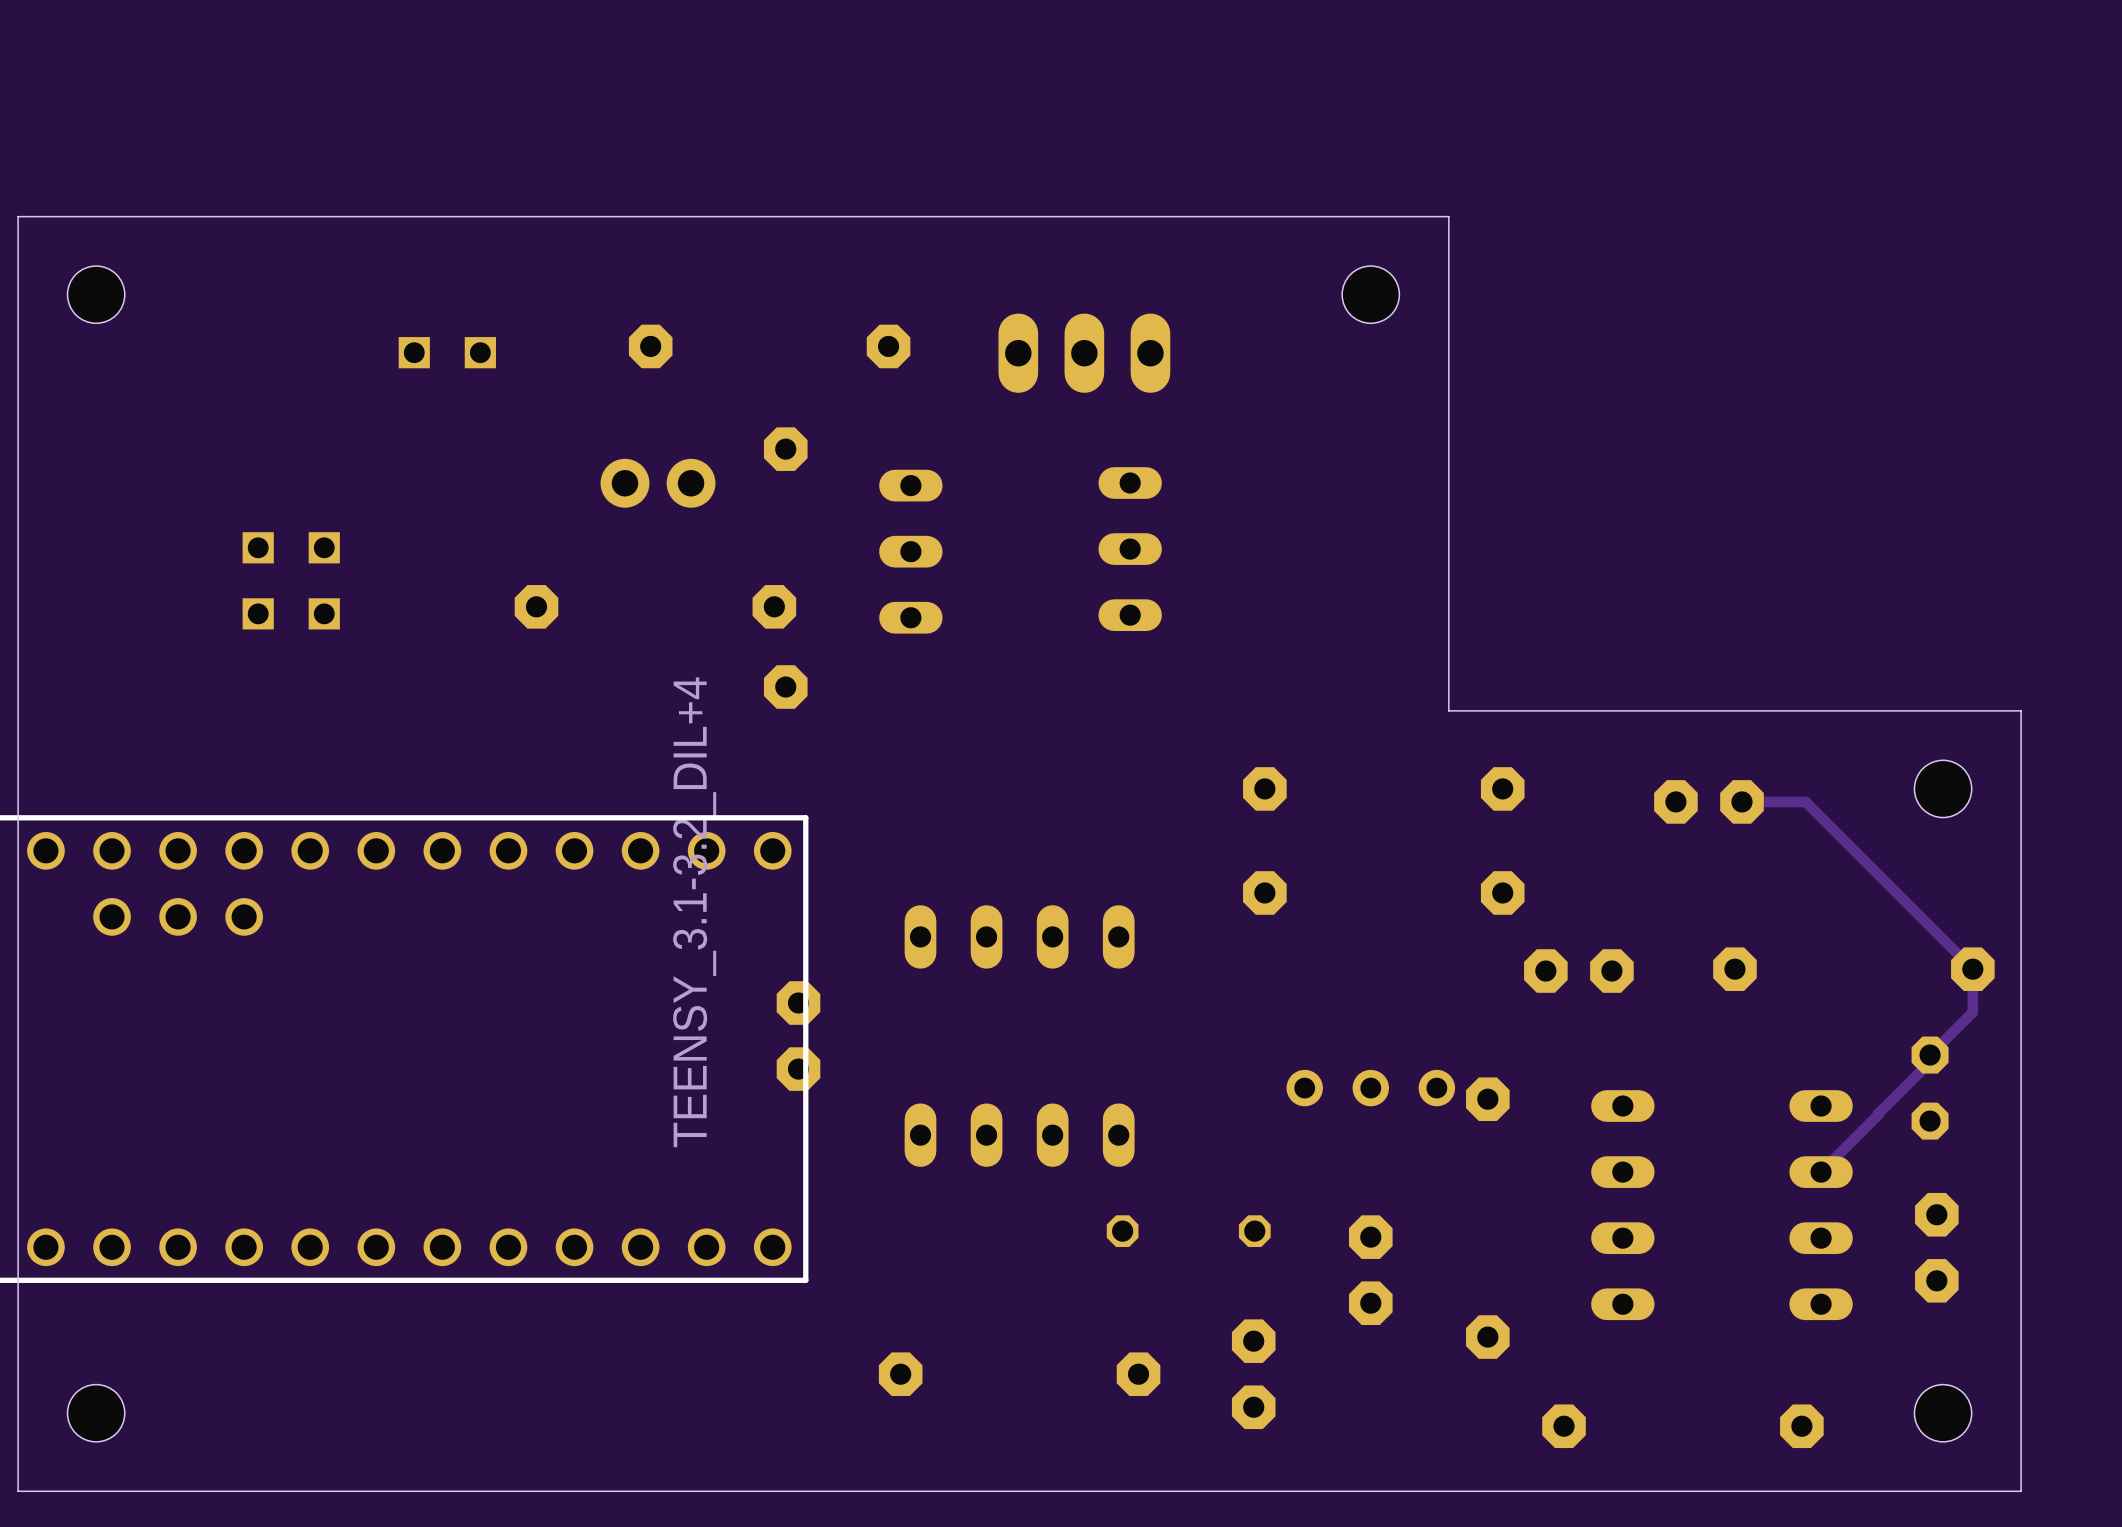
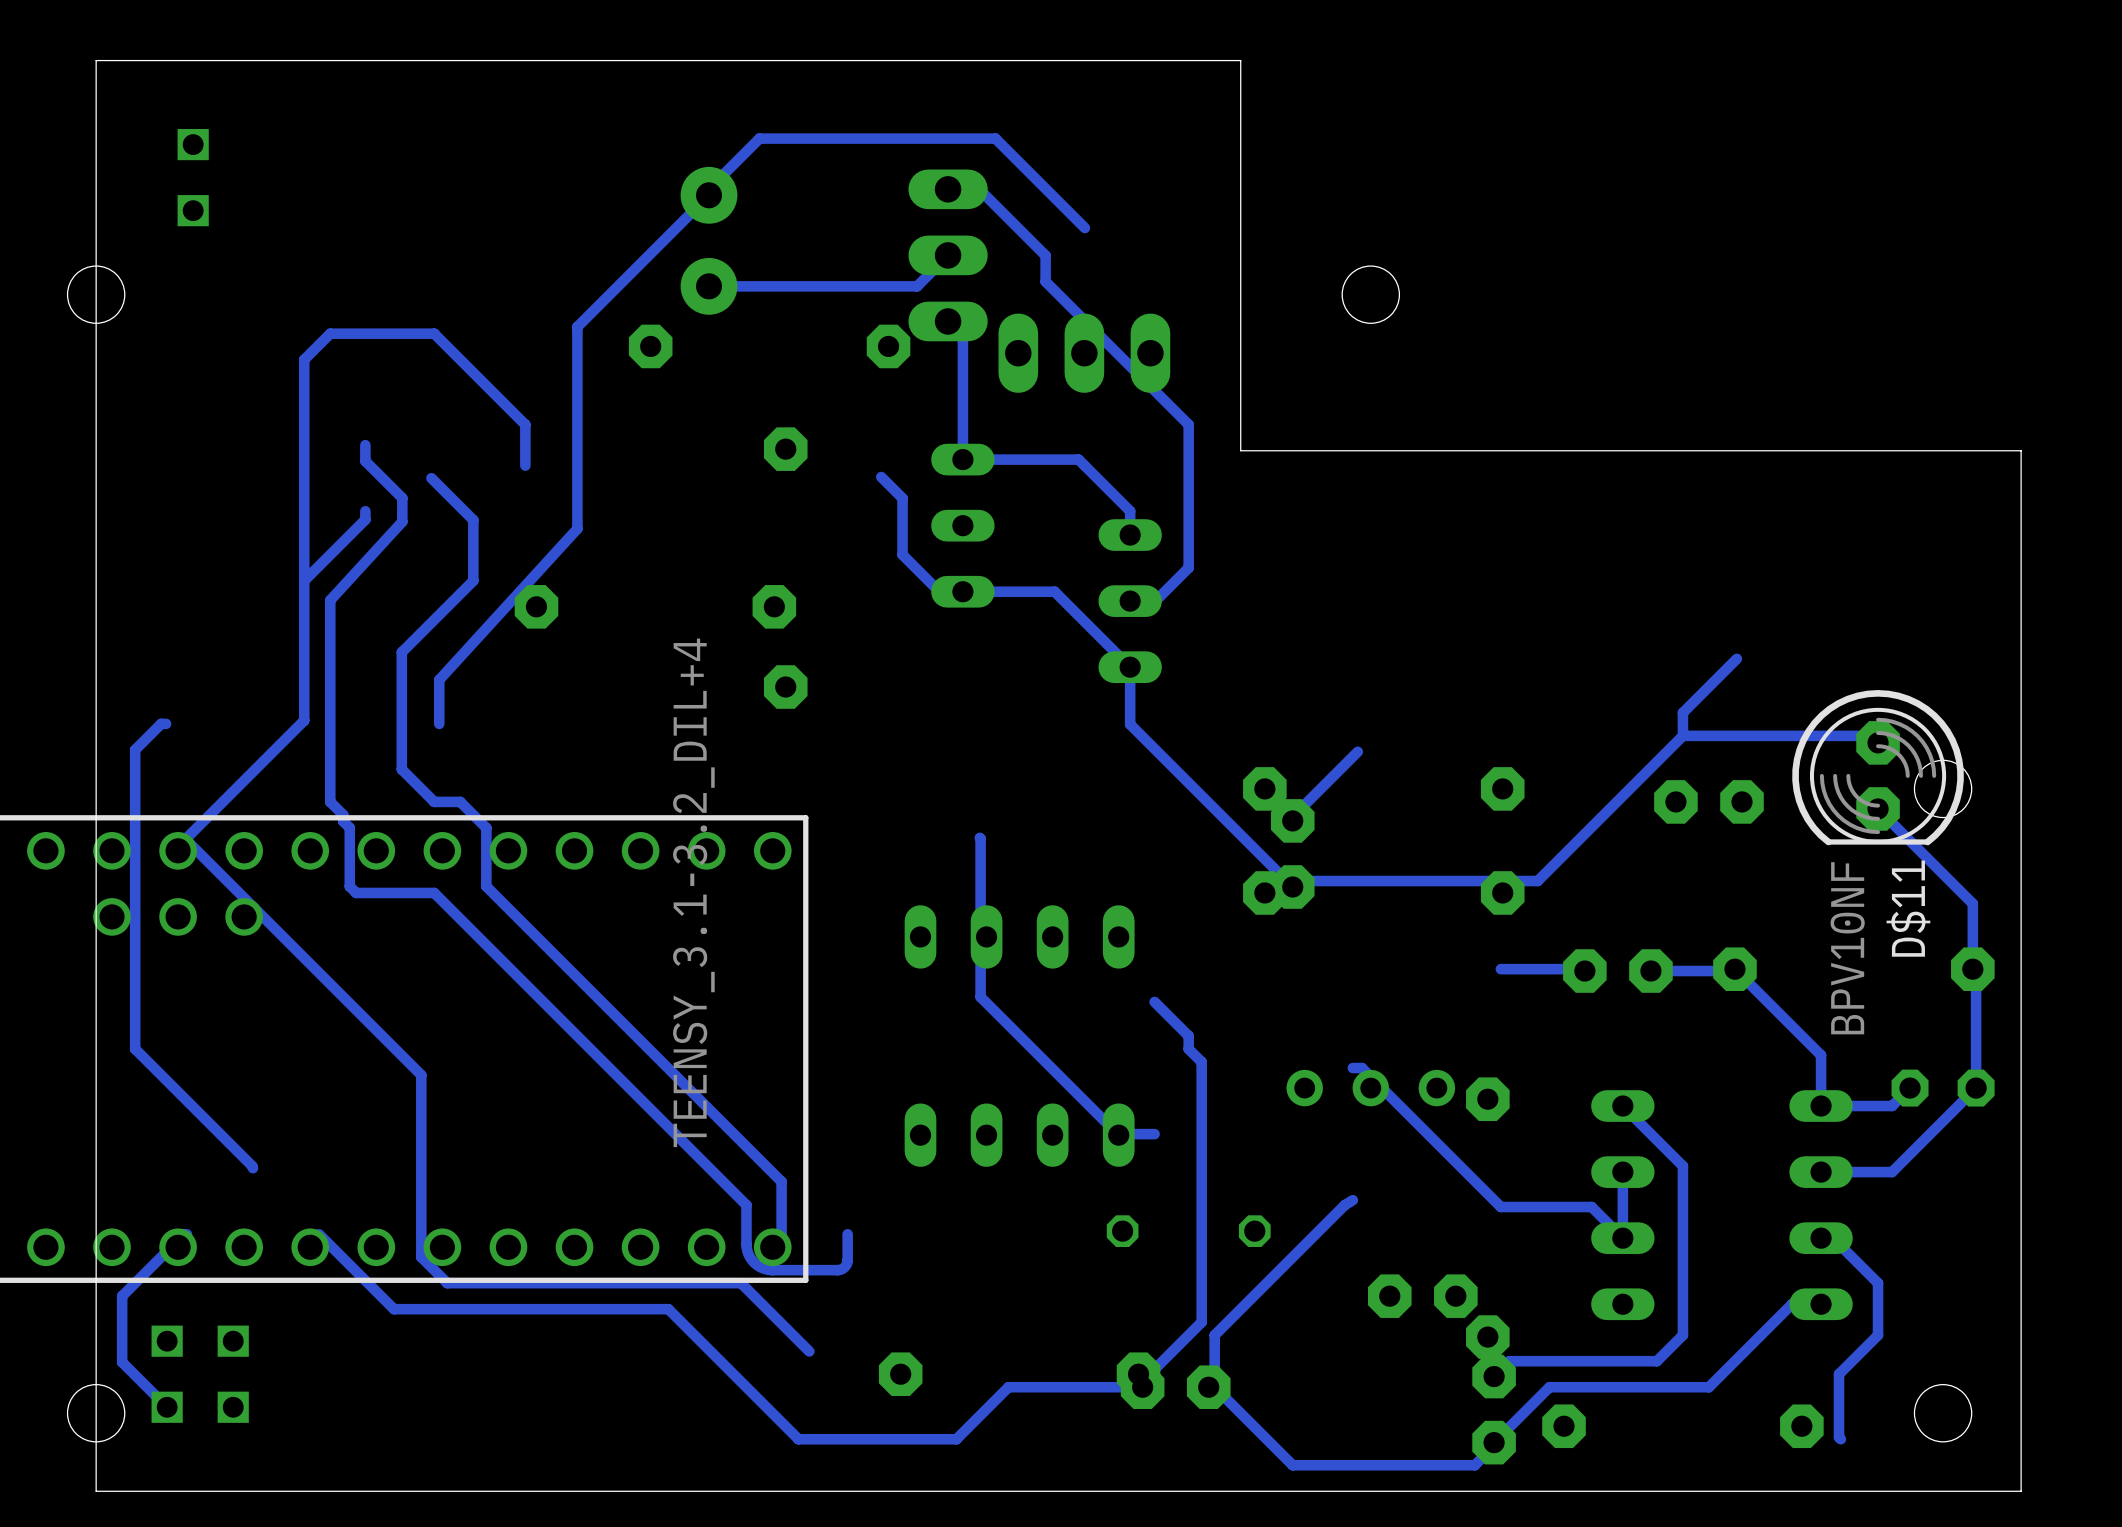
track: none -> (948, 189) (980, 190) (1045, 255) (1045, 281) (1188, 424) (1188, 567) (1155, 601) (1130, 601)
track: none -> (1084, 228) (995, 138) (759, 138) (709, 189) (709, 195) (577, 326) (577, 528) (439, 679) (439, 723)
part: none -> (709, 240)
track: none -> (948, 255) (917, 286) (709, 286)
part: none -> (948, 255)
track: none -> (948, 321) (962, 336) (962, 459) (1078, 459) (1130, 511) (1130, 535)
part rotation: 0° (447, 352) -> 90° clockwise (193, 177)
part position: (447, 352) -> (193, 177)
track: none -> (365, 445) (365, 461) (402, 498) (402, 521) (330, 600) (330, 801) (343, 814) (343, 821) (349, 827) (349, 886) (356, 892) (434, 892) (746, 1205) (746, 1247) (749, 1257) (756, 1264) (772, 1270) (840, 1269) (847, 1262) (847, 1234)
track: none -> (525, 465) (525, 424) (434, 333) (330, 333) (304, 359) (304, 720) (186, 837) (186, 840) (421, 1075) (421, 1257) (447, 1283) (741, 1283) (809, 1351)
track: none -> (881, 477) (902, 498) (902, 554) (939, 591) (1054, 591) (1130, 667) (1130, 724) (1292, 886) (1298, 881) (1537, 881) (1682, 735)
track: none -> (431, 478) (473, 520) (473, 580) (401, 652) (401, 769) (434, 801) (460, 801) (486, 827) (486, 886) (781, 1181) (781, 1234)
part: (658, 483) -> none
track: none -> (365, 511) (365, 519) (304, 580)
part position: (1130, 549) -> (1130, 601)
part position: (910, 551) -> (962, 525)
part: (291, 580) -> none
track: none -> (1736, 658) (1682, 712) (1682, 735)
board edge: (2021, 710) (1448, 710) (1448, 216) (18, 216) (18, 1491) (96, 1491) -> (2021, 710) (2021, 450) (1240, 450) (1240, 60) (96, 60) (96, 1491)
track: none -> (166, 723) (161, 723) (135, 749) (135, 1049) (253, 1168)
track: none -> (1682, 735) (1871, 735) (1878, 742)
track: none -> (1357, 751) (1292, 816) (1292, 820)
D$11: none -> BPV10NF (1878, 767)
track: (1741, 801) (1805, 801) (1972, 969) (1972, 1012) (1930, 1055) (1930, 1062) (1821, 1172) -> (1878, 808) (1972, 903) (1972, 969) (1976, 972) (1976, 1088) (1892, 1172) (1821, 1172)
track: none -> (979, 837) (980, 997) (1117, 1134) (1154, 1134)
part: none -> (1292, 853)
track: none -> (1500, 969) (1583, 969) (1584, 971)
part position: (1578, 971) -> (1617, 971)
track: none -> (1650, 971) (1733, 971) (1734, 969) (1821, 1055) (1821, 1106) (1892, 1106) (1910, 1088)
track: none -> (1154, 1001) (1188, 1036) (1188, 1049) (1201, 1062) (1201, 1322) (1136, 1387)
part: (798, 1036) -> none
track: none -> (1352, 1068) (1361, 1068) (1500, 1207) (1591, 1207) (1622, 1238) (1622, 1172)
part rotation: 0° (1930, 1088) -> 90° clockwise (1943, 1088)
track: none -> (1622, 1106) (1682, 1166) (1682, 1335) (1656, 1361) (1509, 1361) (1494, 1376)
track: none -> (1352, 1200) (1344, 1205) (1214, 1335) (1214, 1387)
track: none -> (186, 1234) (184, 1234) (122, 1296) (122, 1362) (167, 1407)
track: none -> (319, 1234) (393, 1309) (668, 1309) (798, 1439) (956, 1439) (1008, 1387) (1142, 1387)
track: none -> (1821, 1238) (1833, 1238) (1878, 1283) (1878, 1335) (1839, 1374) (1839, 1437) (1840, 1439)
part: (1936, 1247) -> none
part rotation: 0° (1370, 1270) -> 90° clockwise (1422, 1296)
track: none -> (1821, 1304) (1791, 1304) (1708, 1387) (1549, 1387) (1494, 1442) (1474, 1465) (1292, 1465) (1214, 1387)
part: none -> (200, 1374)
part rotation: 0° (1253, 1374) -> 90° clockwise (1175, 1387)
part position: (1253, 1374) -> (1175, 1387)
part: none -> (1494, 1409)

